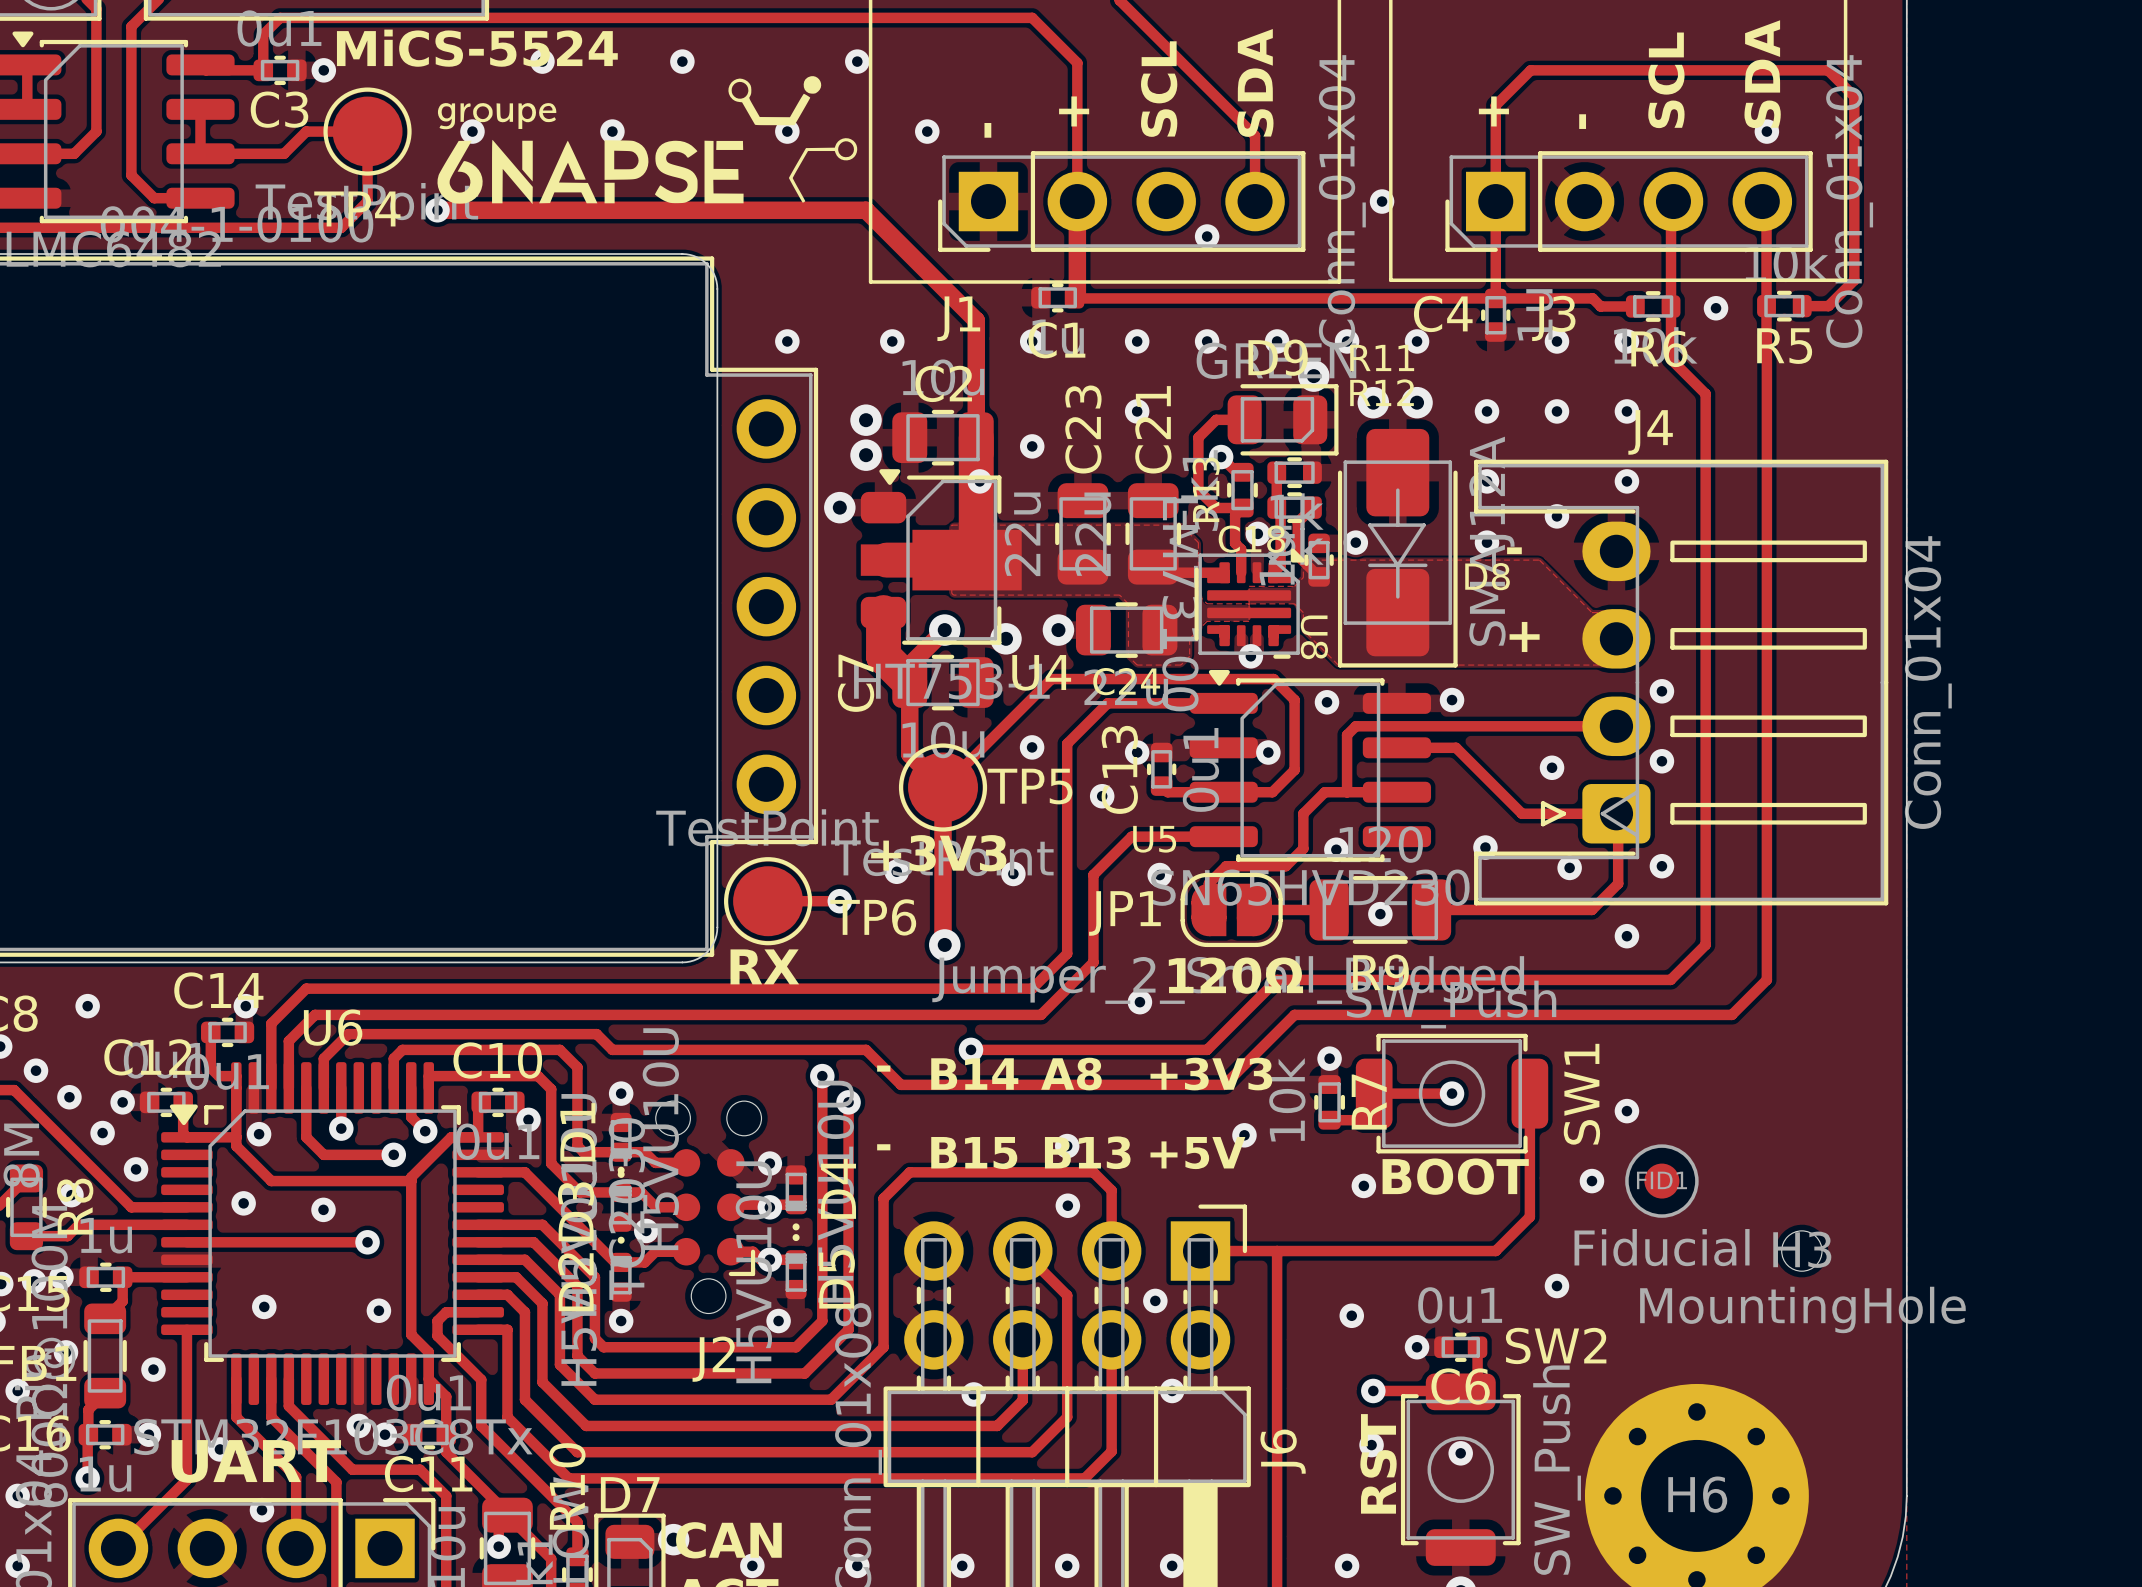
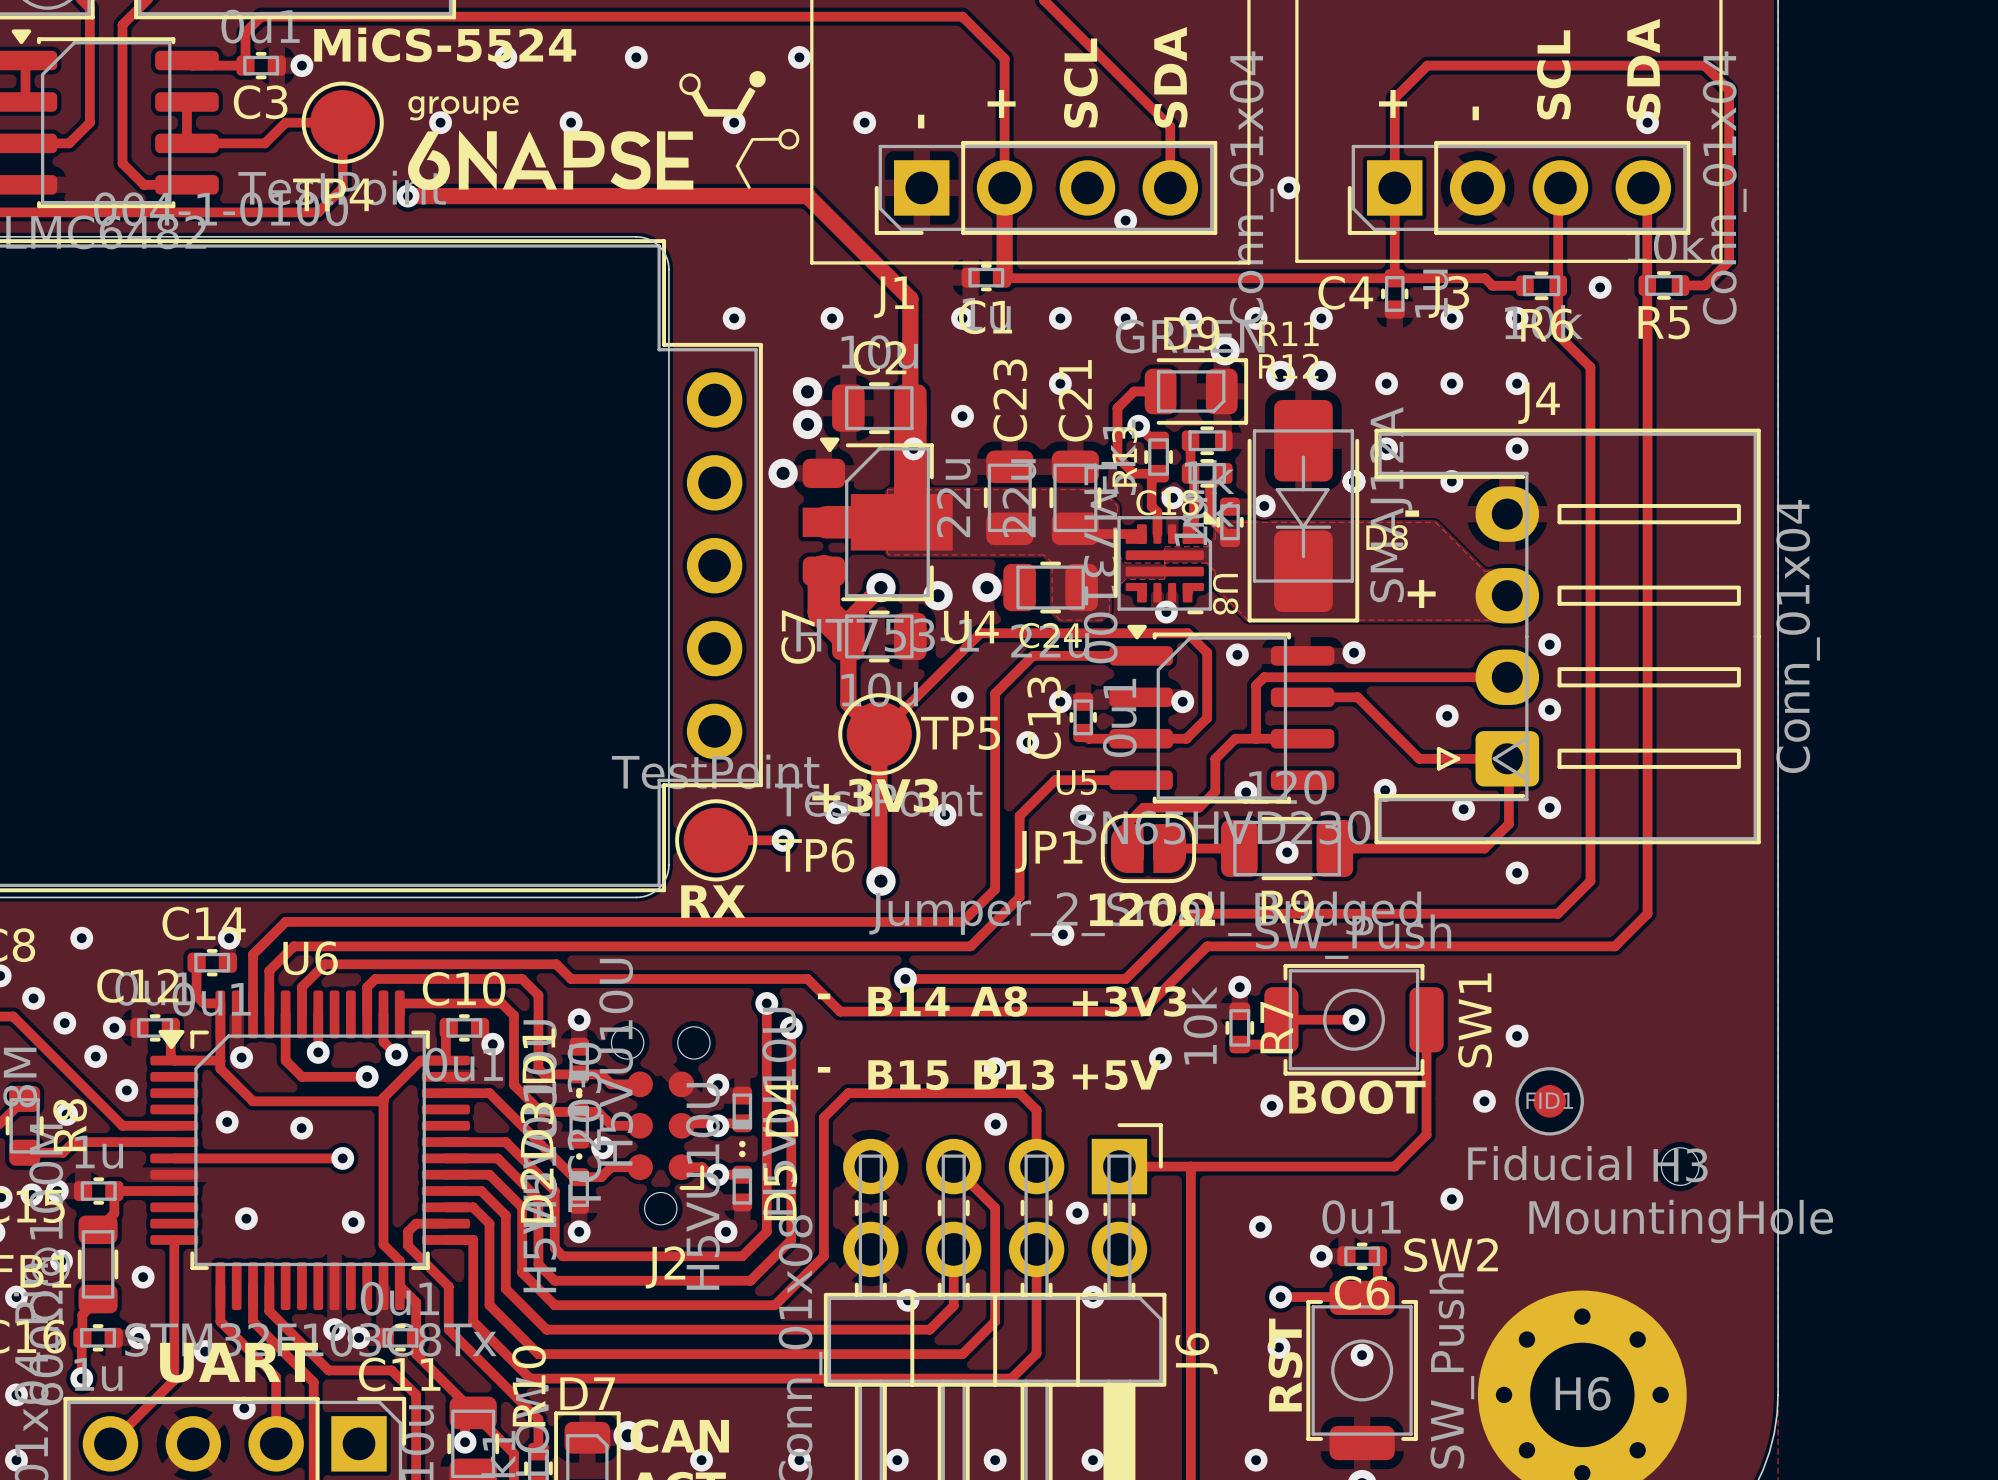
via position: (1487, 542) -> (1353, 481)

